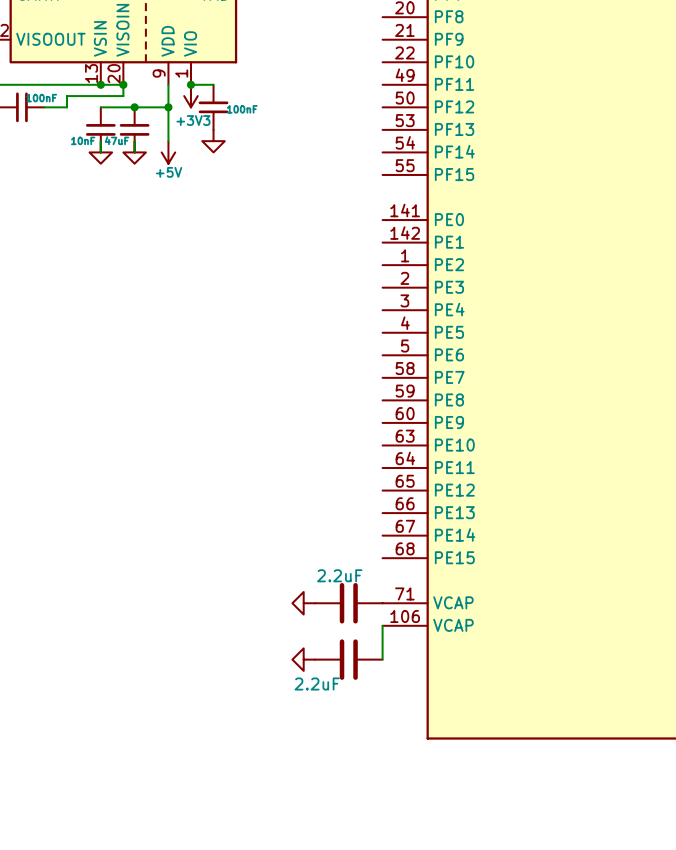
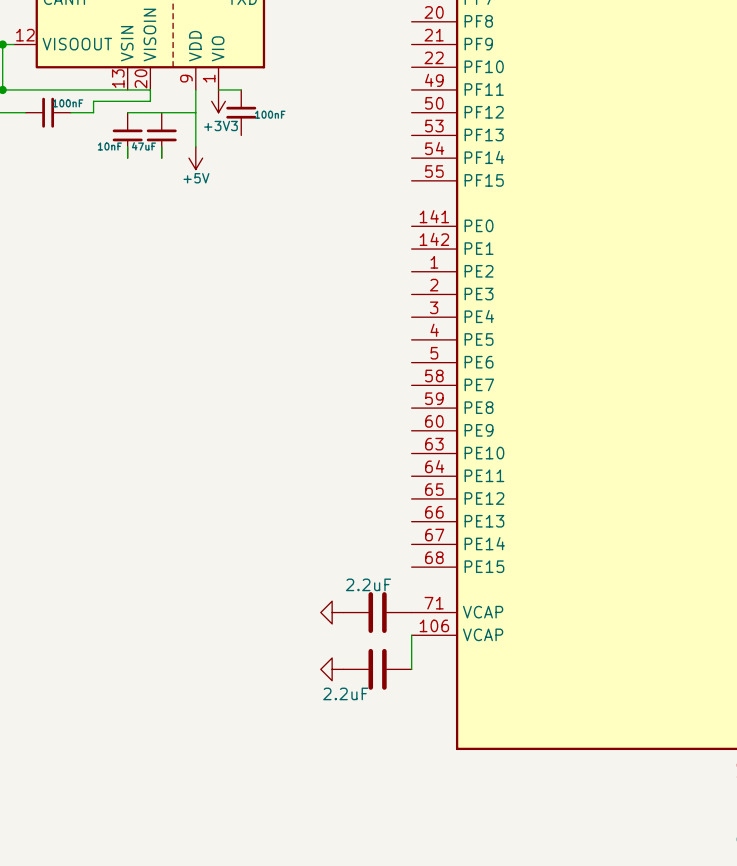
junction: (100, 84) -> none
junction: (123, 84) -> none
junction: (190, 84) -> none
junction: (134, 107) -> none
junction: (168, 107) -> none
power symbol: (213, 141) -> none
power symbol: (100, 152) -> none
power symbol: (134, 152) -> none

